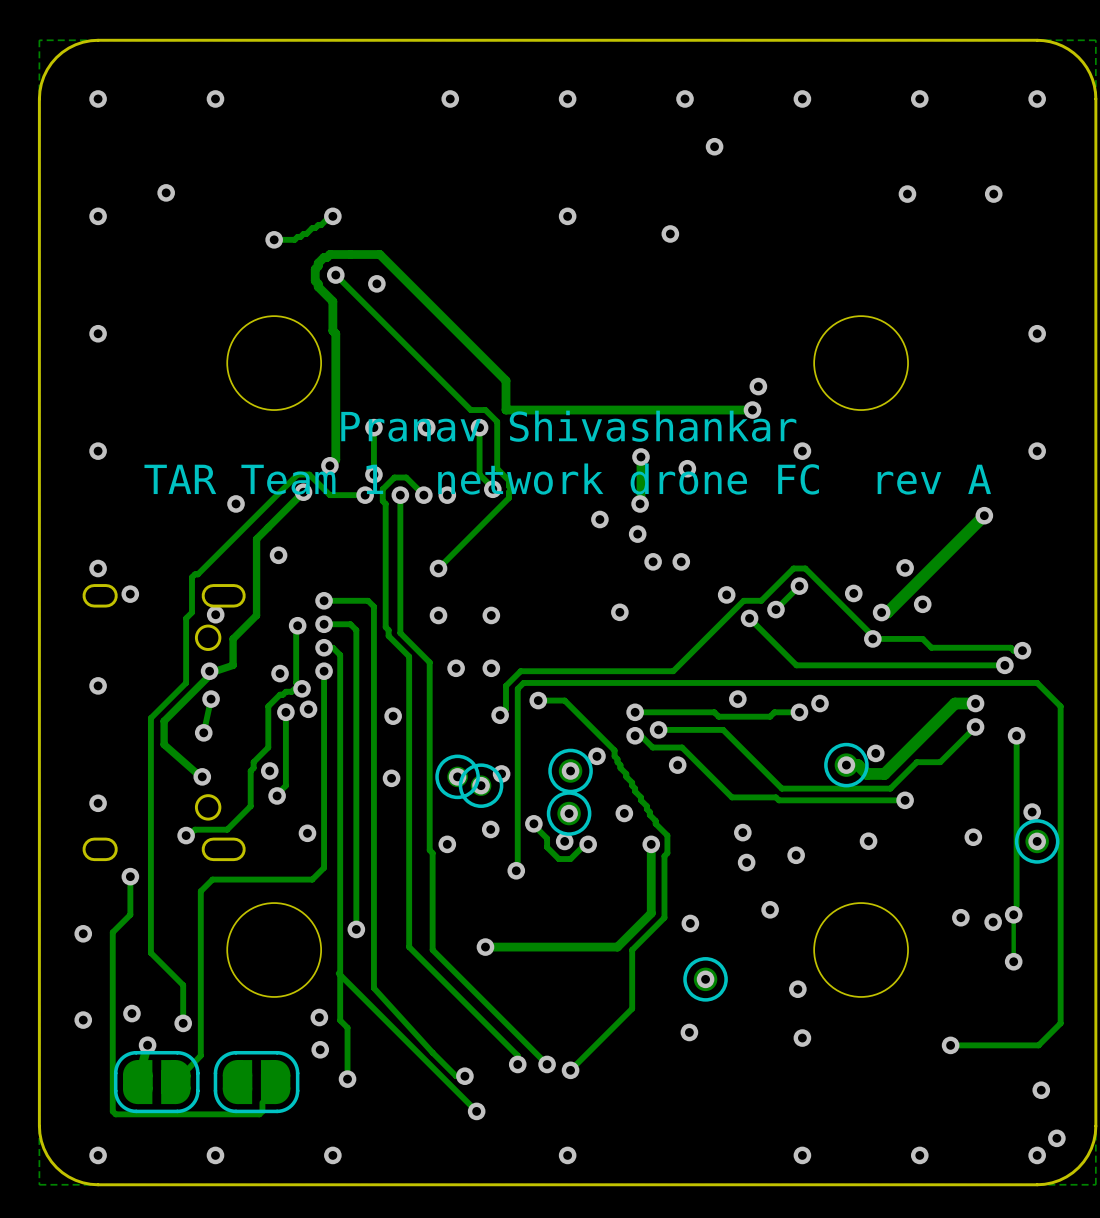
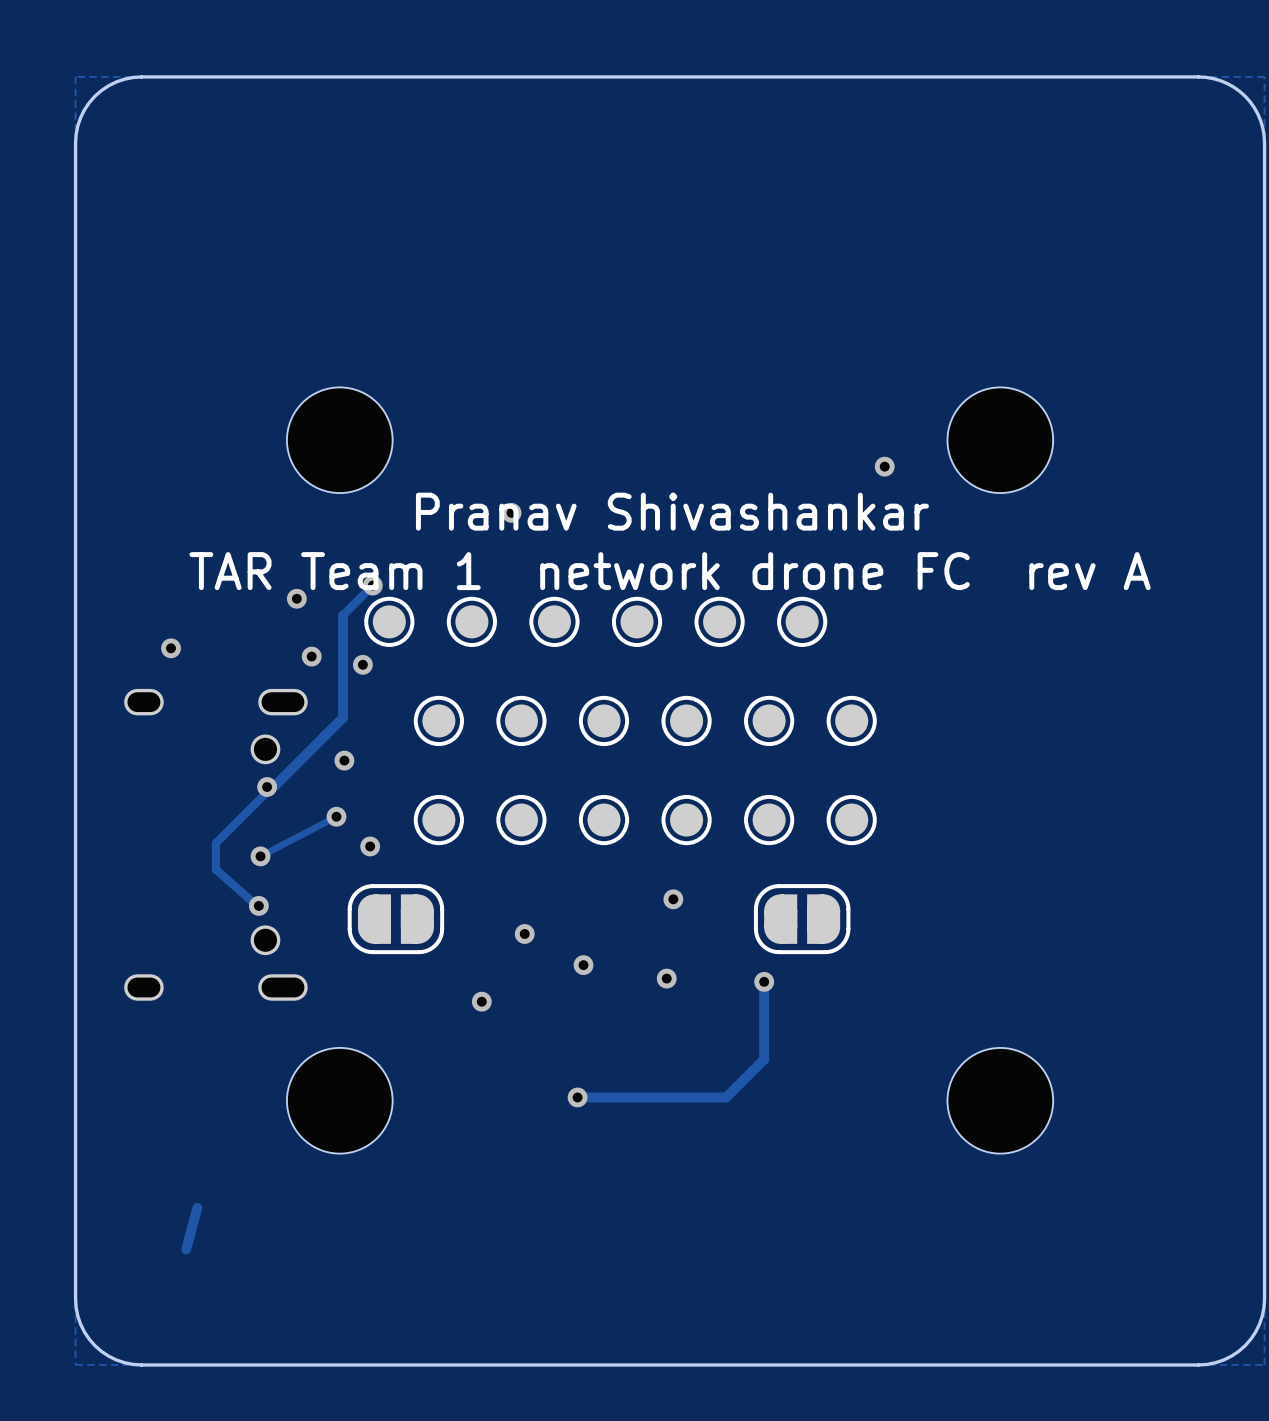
via: (98, 98) -> none
via: (215, 98) -> none
via: (450, 98) -> none
via: (567, 98) -> none
via: (685, 98) -> none
via: (802, 98) -> none
via: (919, 98) -> none
via: (1037, 98) -> none
via: (714, 146) -> none
via: (166, 192) -> none
via: (907, 194) -> none
via: (993, 194) -> none
via: (98, 216) -> none
track: (332, 216) (294, 239) (274, 239) -> none
via: (332, 216) -> none
via: (567, 216) -> none
via: (670, 233) -> none
via: (274, 239) -> none
track: (335, 275) (470, 410) (485, 410) (497, 421) (497, 468) (508, 480) (508, 486) (511, 489) (508, 492) (508, 498) (438, 568) -> none
via: (335, 275) -> none
via: (376, 283) -> none
via: (98, 333) -> none
via: (1037, 333) -> none
track: (752, 410) (506, 410) (506, 380) (379, 254) (329, 254) (318, 263) (315, 269) (315, 280) (318, 286) (332, 301) (332, 330) (335, 333) (335, 459) (329, 465) -> none
via: (752, 410) -> none
track: (373, 427) (373, 474) -> none
via: (373, 427) -> none
track: (479, 427) (479, 474) (494, 489) -> none
via: (479, 427) -> none
via: (98, 451) -> none
via: (802, 451) -> none
via: (1037, 451) -> none
track: (640, 456) (640, 503) -> none
via: (640, 456) -> none
via: (329, 465) -> none
via: (687, 468) -> none
via: (373, 474) -> none
via: (492, 489) -> none
track: (365, 495) (329, 495) (309, 474) (297, 474) (197, 574) (192, 577) (192, 612) (186, 618) (186, 682) (150, 718) (150, 952) (183, 985) (183, 1023) -> none
via: (365, 495) -> none
track: (400, 495) (400, 633) (429, 662) (429, 850) (432, 853) (432, 950) (547, 1064) -> none
via: (400, 495) -> none
track: (423, 495) (406, 477) (394, 477) (382, 489) (382, 501) (385, 503) (385, 627) (388, 630) (388, 636) (409, 656) (409, 947) (517, 1055) (517, 1064) -> none
via: (423, 495) -> none
via: (447, 495) -> none
via: (640, 503) -> none
track: (984, 515) (887, 612) (881, 612) -> none
via: (984, 515) -> none
track: (277, 518) (256, 539) (256, 615) (233, 638) (233, 665) (209, 671) -> (343, 615) (343, 717) (275, 785) (267, 787)
via: (599, 519) -> none
part: none -> (389, 621)
part: none -> (471, 621)
part: none -> (554, 621)
part: none -> (637, 621)
part: none -> (719, 621)
part: none -> (802, 621)
via: (637, 534) -> none
via: none -> (171, 648)
via: none -> (311, 656)
via position: (278, 555) -> (362, 664)
via: (653, 561) -> none
via: (681, 561) -> none
via: (905, 567) -> none
via: (98, 568) -> none
via: (438, 568) -> none
track: (799, 586) (775, 609) -> none
via: (799, 586) -> none
via: (853, 593) -> none
via: (130, 594) -> none
via: (726, 594) -> none
track: (324, 600) (368, 600) (373, 606) (373, 988) (456, 1076) (464, 1076) -> none
via: (324, 600) -> none
via: (922, 604) -> none
via: (775, 609) -> none
part: none -> (438, 720)
part: none -> (521, 720)
part: none -> (604, 720)
part: none -> (686, 720)
via: (619, 612) -> none
part: none -> (769, 720)
part: none -> (851, 720)
via: (881, 612) -> none
via: (215, 614) -> none
via: (438, 615) -> none
via: (491, 615) -> none
track: (749, 618) (796, 665) (1004, 665) -> none
via: (749, 618) -> none
track: (324, 624) (350, 624) (356, 630) (356, 929) -> none
via: (324, 624) -> none
track: (297, 625) (296, 682) (302, 688) -> none
via: (297, 625) -> none
via: (872, 638) -> none
via: none -> (344, 760)
track: (324, 647) (332, 647) (340, 655) (340, 1020) (347, 1027) (347, 1079) -> none
via: (324, 647) -> none
track: (1022, 650) (1013, 650) (1010, 647) (931, 647) (922, 638) (872, 638) (869, 633) (805, 568) (793, 568) (761, 600) (743, 600) (673, 671) (520, 671) (506, 685) (506, 709) (500, 715) -> none
via: (1022, 650) -> none
via: (1004, 665) -> none
via: (456, 668) -> none
via: (491, 668) -> none
track: (324, 671) (324, 867) (312, 879) (212, 879) (200, 891) (200, 1055) (175, 1082) -> none
via: (324, 671) -> none
via: (280, 673) -> none
via: (98, 685) -> none
track: (297, 685) (291, 691) (280, 694) (268, 706) (268, 747) (253, 762) (253, 768) (250, 770) (250, 806) (227, 829) (194, 829) (189, 835) (186, 835) -> none
via: (302, 688) -> none
via: none -> (336, 816)
track: (211, 699) (203, 732) -> (336, 816) (260, 856)
via: (211, 699) -> none
via: (737, 699) -> none
part: none -> (438, 820)
part: none -> (521, 820)
part: none -> (604, 820)
track: (538, 700) (564, 700) (614, 750) (614, 756) (620, 768) (632, 782) (635, 791) (646, 806) (655, 823) (667, 835) (667, 853) (664, 856) (664, 917) (632, 950) (632, 1008) (570, 1070) -> none
via: (538, 700) -> none
part: none -> (686, 820)
part: none -> (769, 820)
part: none -> (851, 820)
via: (820, 703) -> none
track: (975, 703) (954, 703) (884, 773) (866, 773) (858, 765) (846, 765) -> none
via: (975, 703) -> none
via: (308, 709) -> none
track: (285, 712) (285, 785) (277, 795) -> none
via: (285, 712) -> none
via: (635, 712) -> none
track: (799, 712) (774, 712) (770, 716) (718, 716) (714, 712) (635, 712) -> none
via: (799, 712) -> none
via: (500, 715) -> none
via: (393, 716) -> none
via: none -> (370, 846)
track: (975, 726) (940, 762) (916, 762) (890, 788) (781, 788) (723, 729) (658, 729) -> none
via: (975, 726) -> none
via: (658, 729) -> none
track: (635, 735) (640, 735) (652, 747) (682, 747) (731, 797) (775, 797) (778, 800) (905, 800) -> none
via: (635, 735) -> none
track: (1016, 735) (1016, 905) -> none
via: (1016, 735) -> none
via: (875, 753) -> none
via: (596, 756) -> none
via: (677, 765) -> none
part: (846, 765) -> none
via: (846, 765) -> none
via: (269, 770) -> none
part: (570, 770) -> none
via: (501, 773) -> none
part: (457, 776) -> none
via: (457, 776) -> none
via: (391, 778) -> none
part: (481, 785) -> none
via: (481, 785) -> none
part: none -> (395, 919)
part: none -> (802, 919)
via: (277, 795) -> none
via: (905, 800) -> none
via: none -> (524, 933)
via: (98, 803) -> none
via: (1032, 812) -> none
part: (569, 813) -> none
via: (569, 813) -> none
via: (624, 813) -> none
track: (532, 823) (547, 838) (547, 847) (558, 859) (570, 859) (585, 844) (588, 844) -> none
via: (533, 823) -> none
via: (742, 832) -> none
via: (307, 833) -> none
via: (186, 835) -> none
via: (973, 837) -> none
via: (868, 841) -> none
part: (1037, 841) -> none
via: (1037, 841) -> none
via: (447, 844) -> none
via: (588, 844) -> none
via: (796, 855) -> none
via: none -> (481, 1001)
via: (746, 862) -> none
track: (516, 870) (517, 688) (523, 682) (1037, 682) (1060, 706) (1060, 1023) (1038, 1045) (950, 1045) -> none
via: (516, 870) -> none
track: (130, 876) (130, 914) (112, 932) (112, 1111) (115, 1114) (259, 1114) (262, 1111) (262, 1102) -> none
via: (130, 876) -> none
via: (770, 909) -> none
track: (1013, 914) (1013, 961) -> none
via: (1013, 914) -> none
via: (960, 917) -> none
via: (993, 922) -> none
via: (690, 923) -> none
via: (356, 929) -> none
via: (83, 933) -> none
via: (1013, 961) -> none
track: (338, 973) (476, 1111) -> none
part: (705, 979) -> none
via: (705, 979) -> none
via: (797, 989) -> none
via: (131, 1013) -> none
via: (319, 1017) -> none
via: (83, 1020) -> none
via: (183, 1023) -> none
via: (689, 1032) -> none
via: (802, 1038) -> none
via: (147, 1045) -> none
via: (950, 1045) -> none
via: (320, 1049) -> none
via: (517, 1064) -> none
via: (547, 1064) -> none
via: (570, 1070) -> none
via: (464, 1076) -> none
via: (347, 1079) -> none
part: (156, 1082) -> none
part: (256, 1082) -> none
via: (1041, 1090) -> none
via: (476, 1111) -> none
via: (1056, 1138) -> none
via: (98, 1155) -> none
via: (215, 1155) -> none
via: (332, 1155) -> none
via: (567, 1155) -> none
via: (802, 1155) -> none
via: (919, 1155) -> none
via: (1037, 1155) -> none

